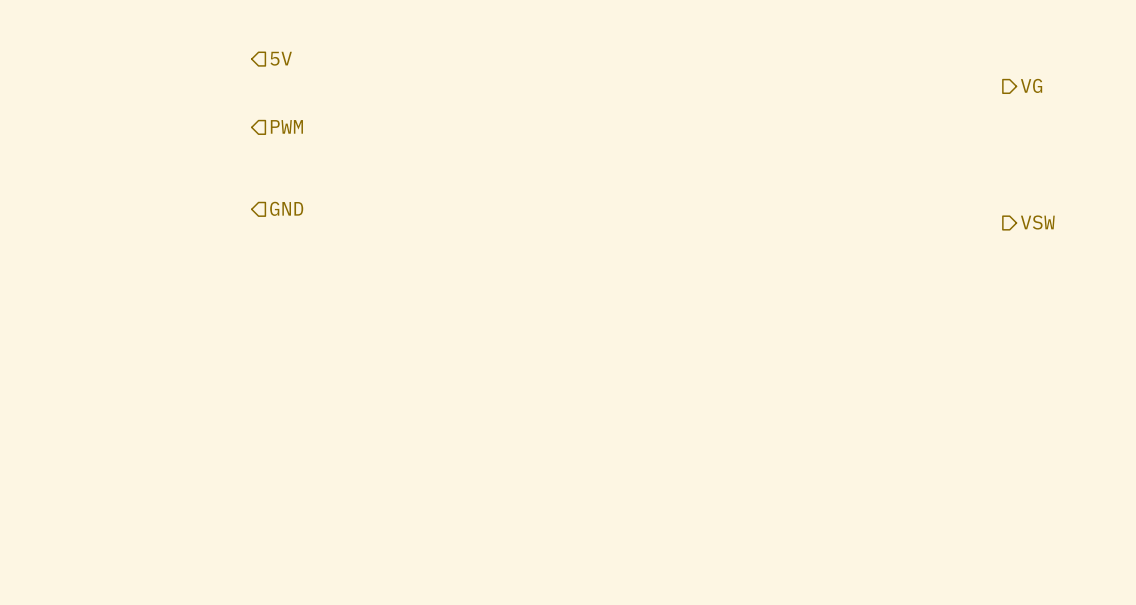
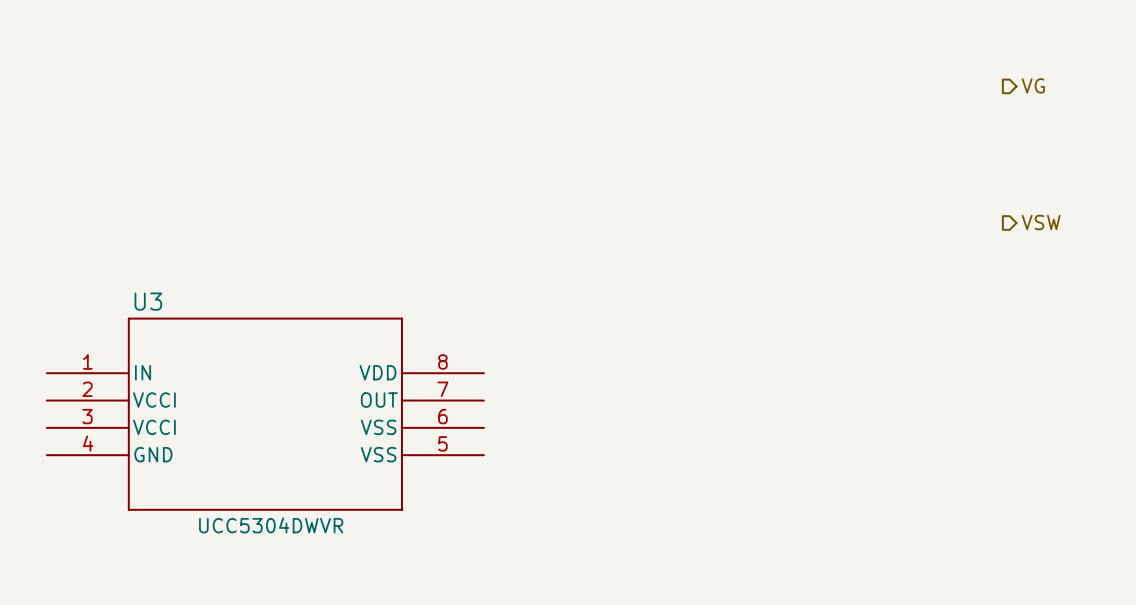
hierarchical label: 5V (281, 58) -> none
hierarchical label: PWM (286, 126) -> none
hierarchical label: GND (286, 208) -> none
U3: none -> (265, 414)

